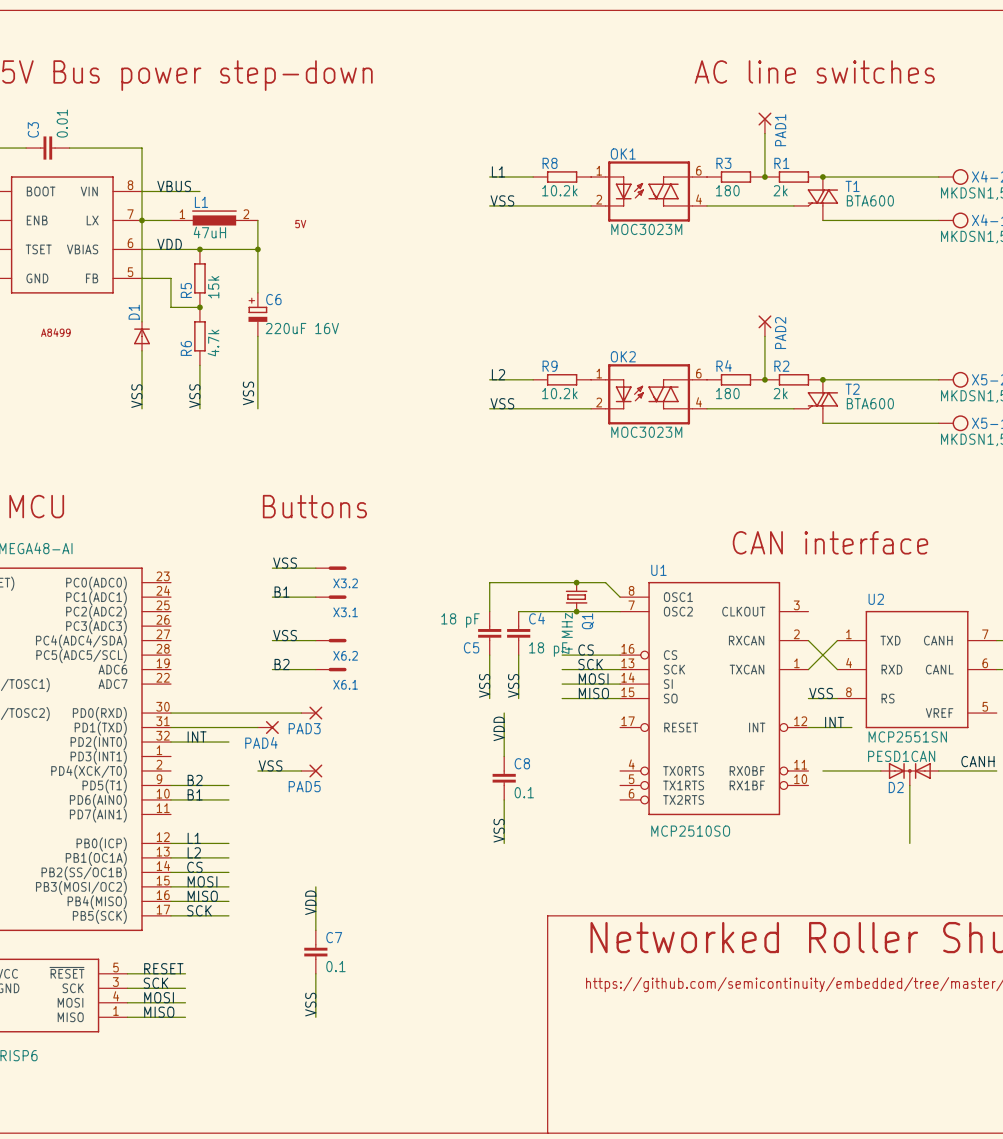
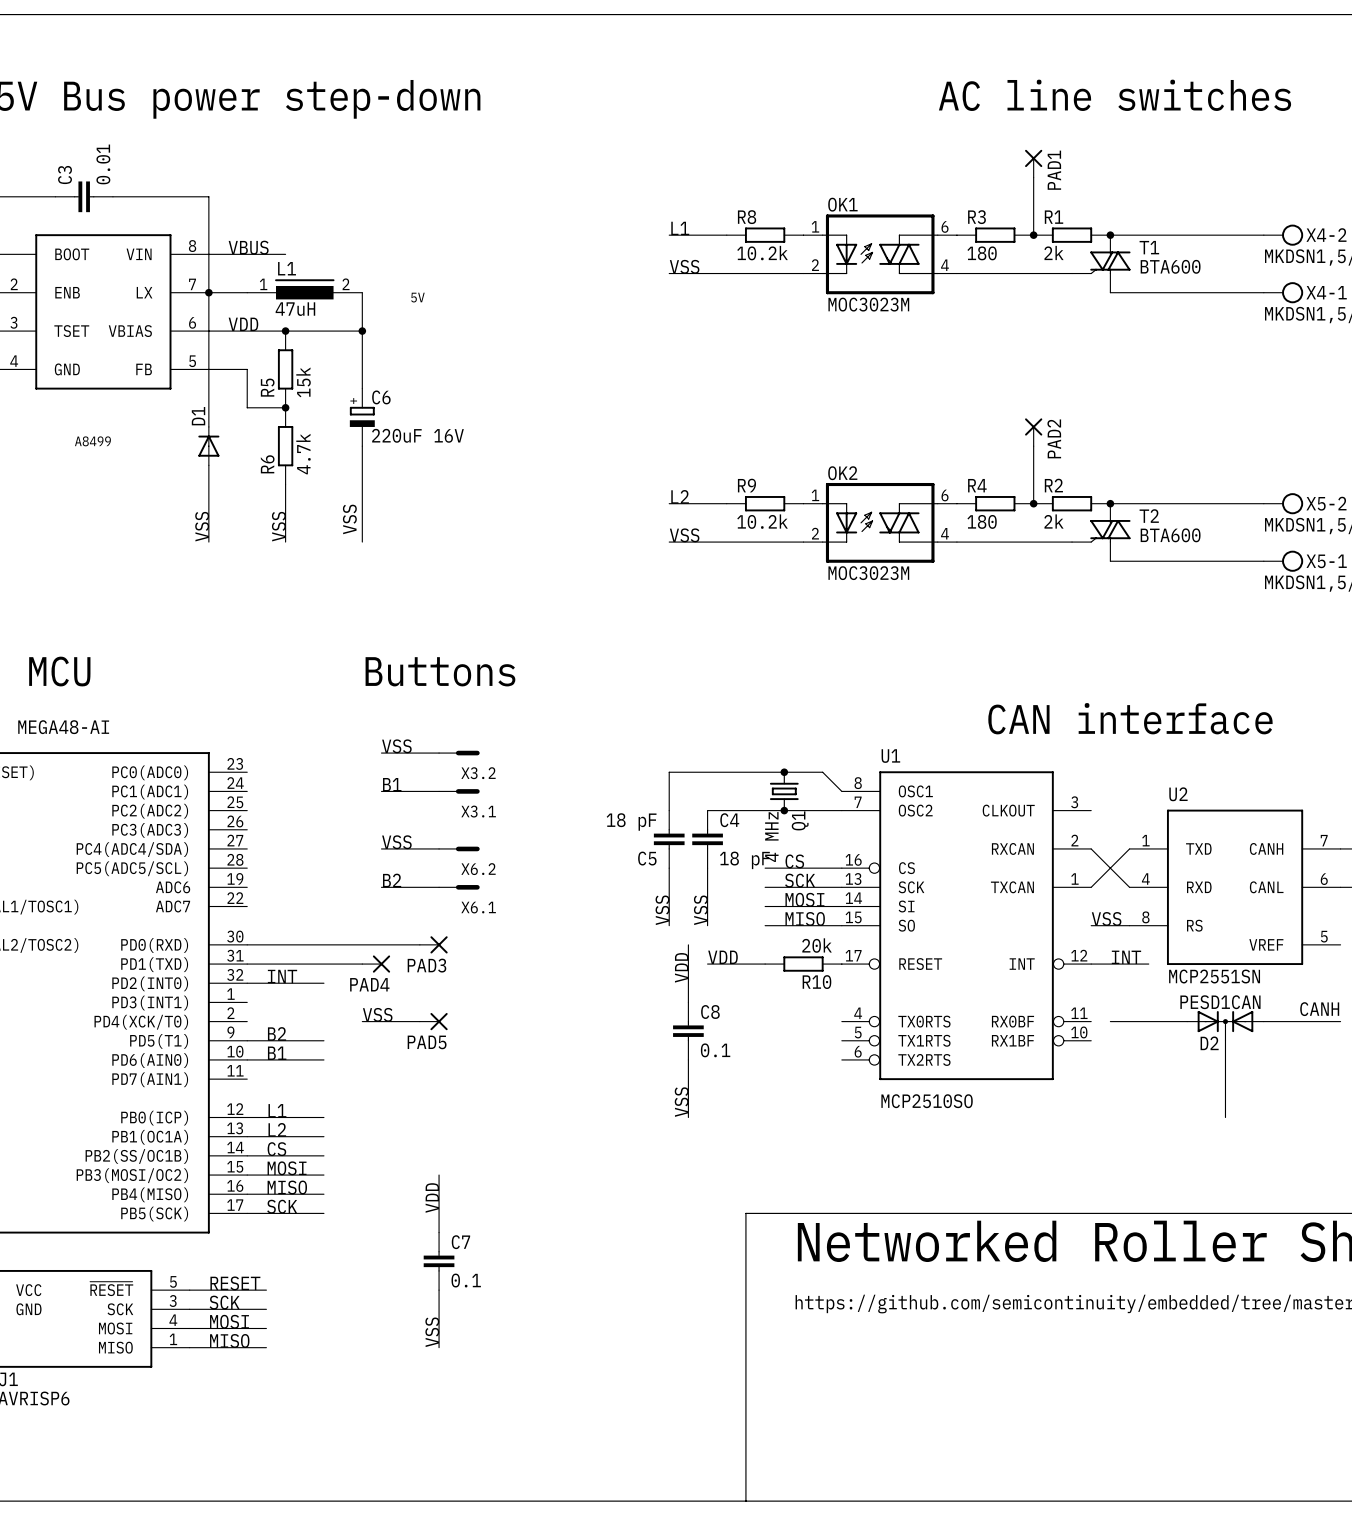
label: none -> VDD (722, 957)
wire: none -> (707, 964) (765, 964)
R10: none -> 20k (803, 964)

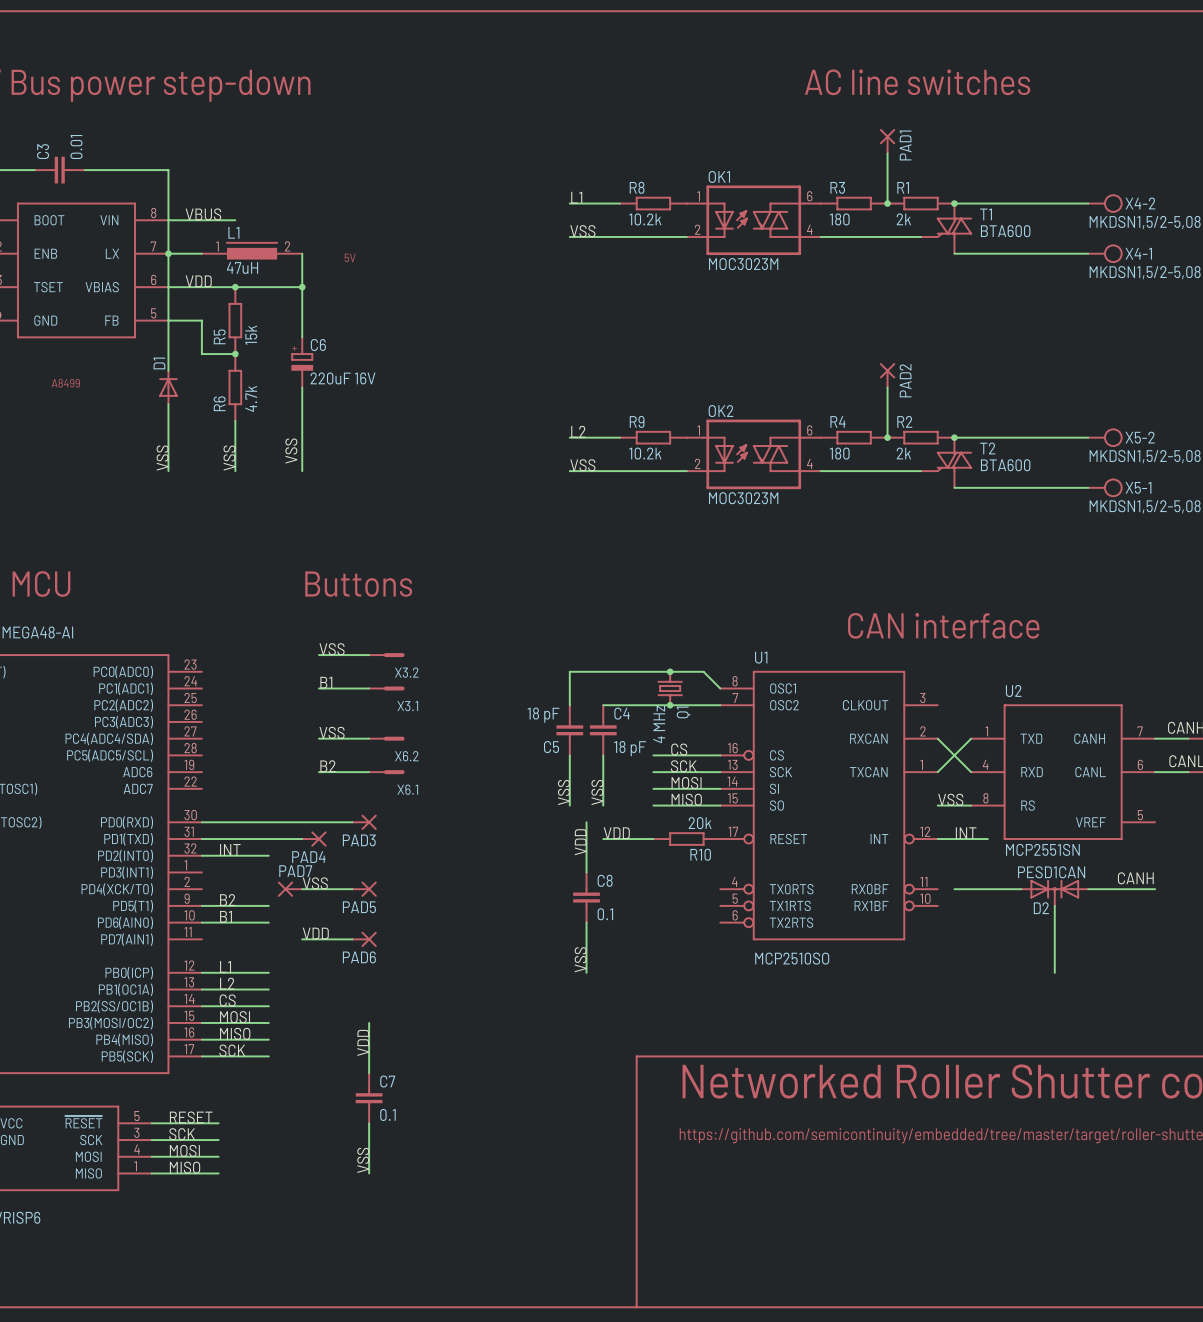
PAD7: none -> (290, 889)
label: none -> VDD (315, 933)
wire: none -> (302, 939) (352, 939)
PAD6: none -> (364, 939)

